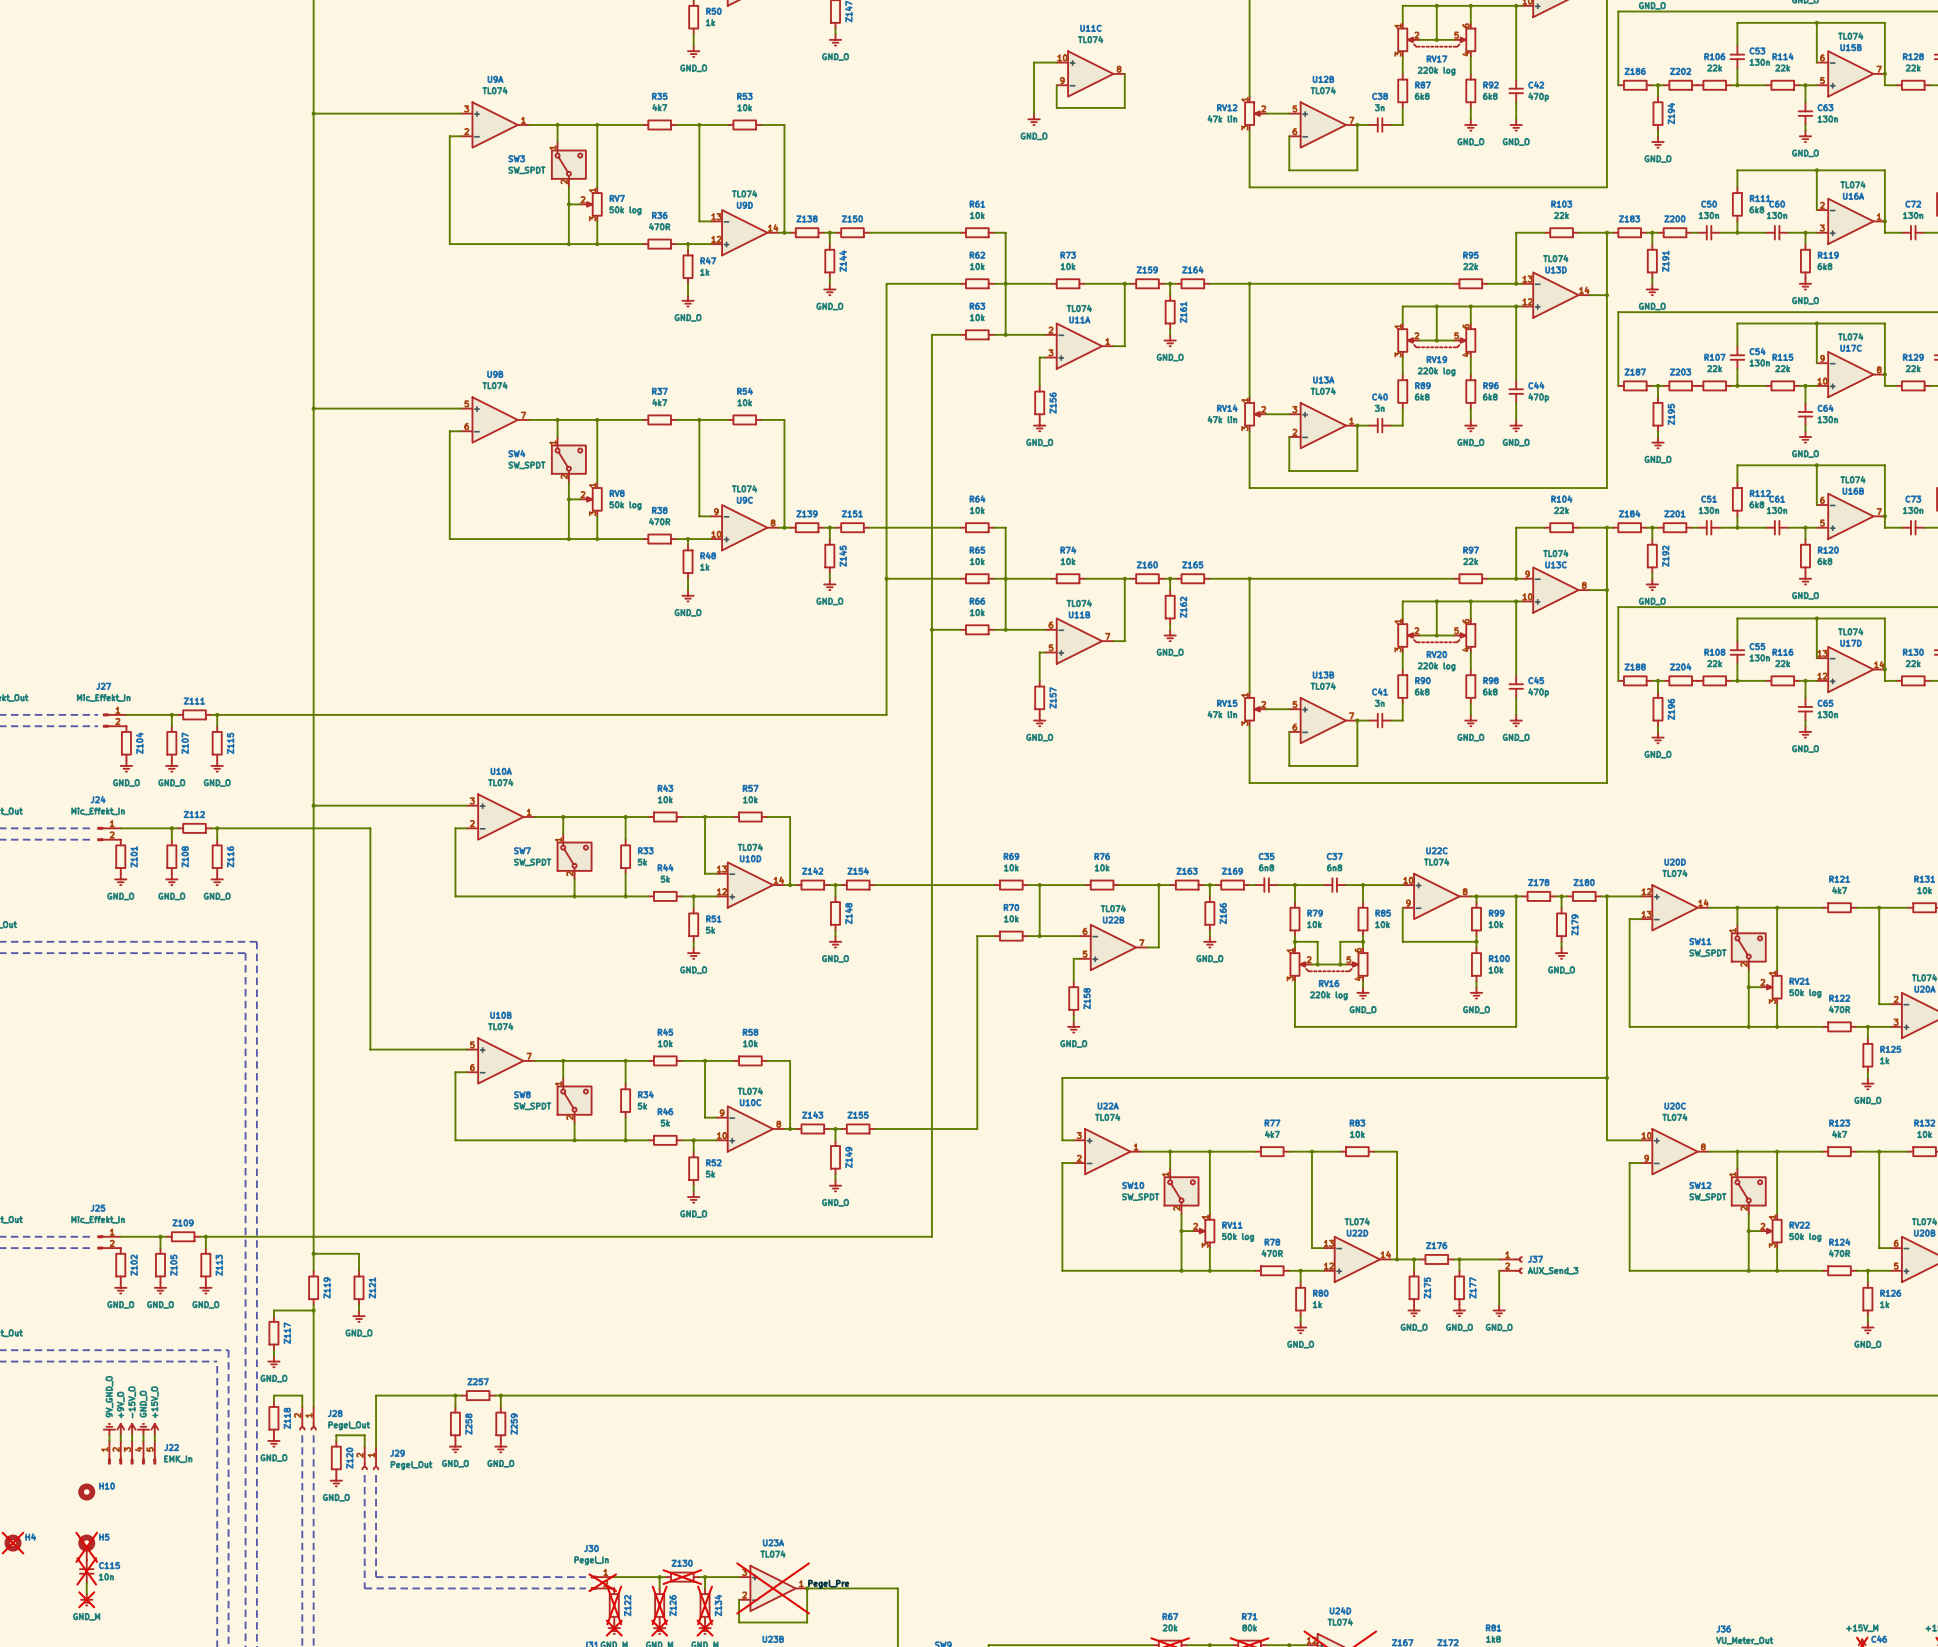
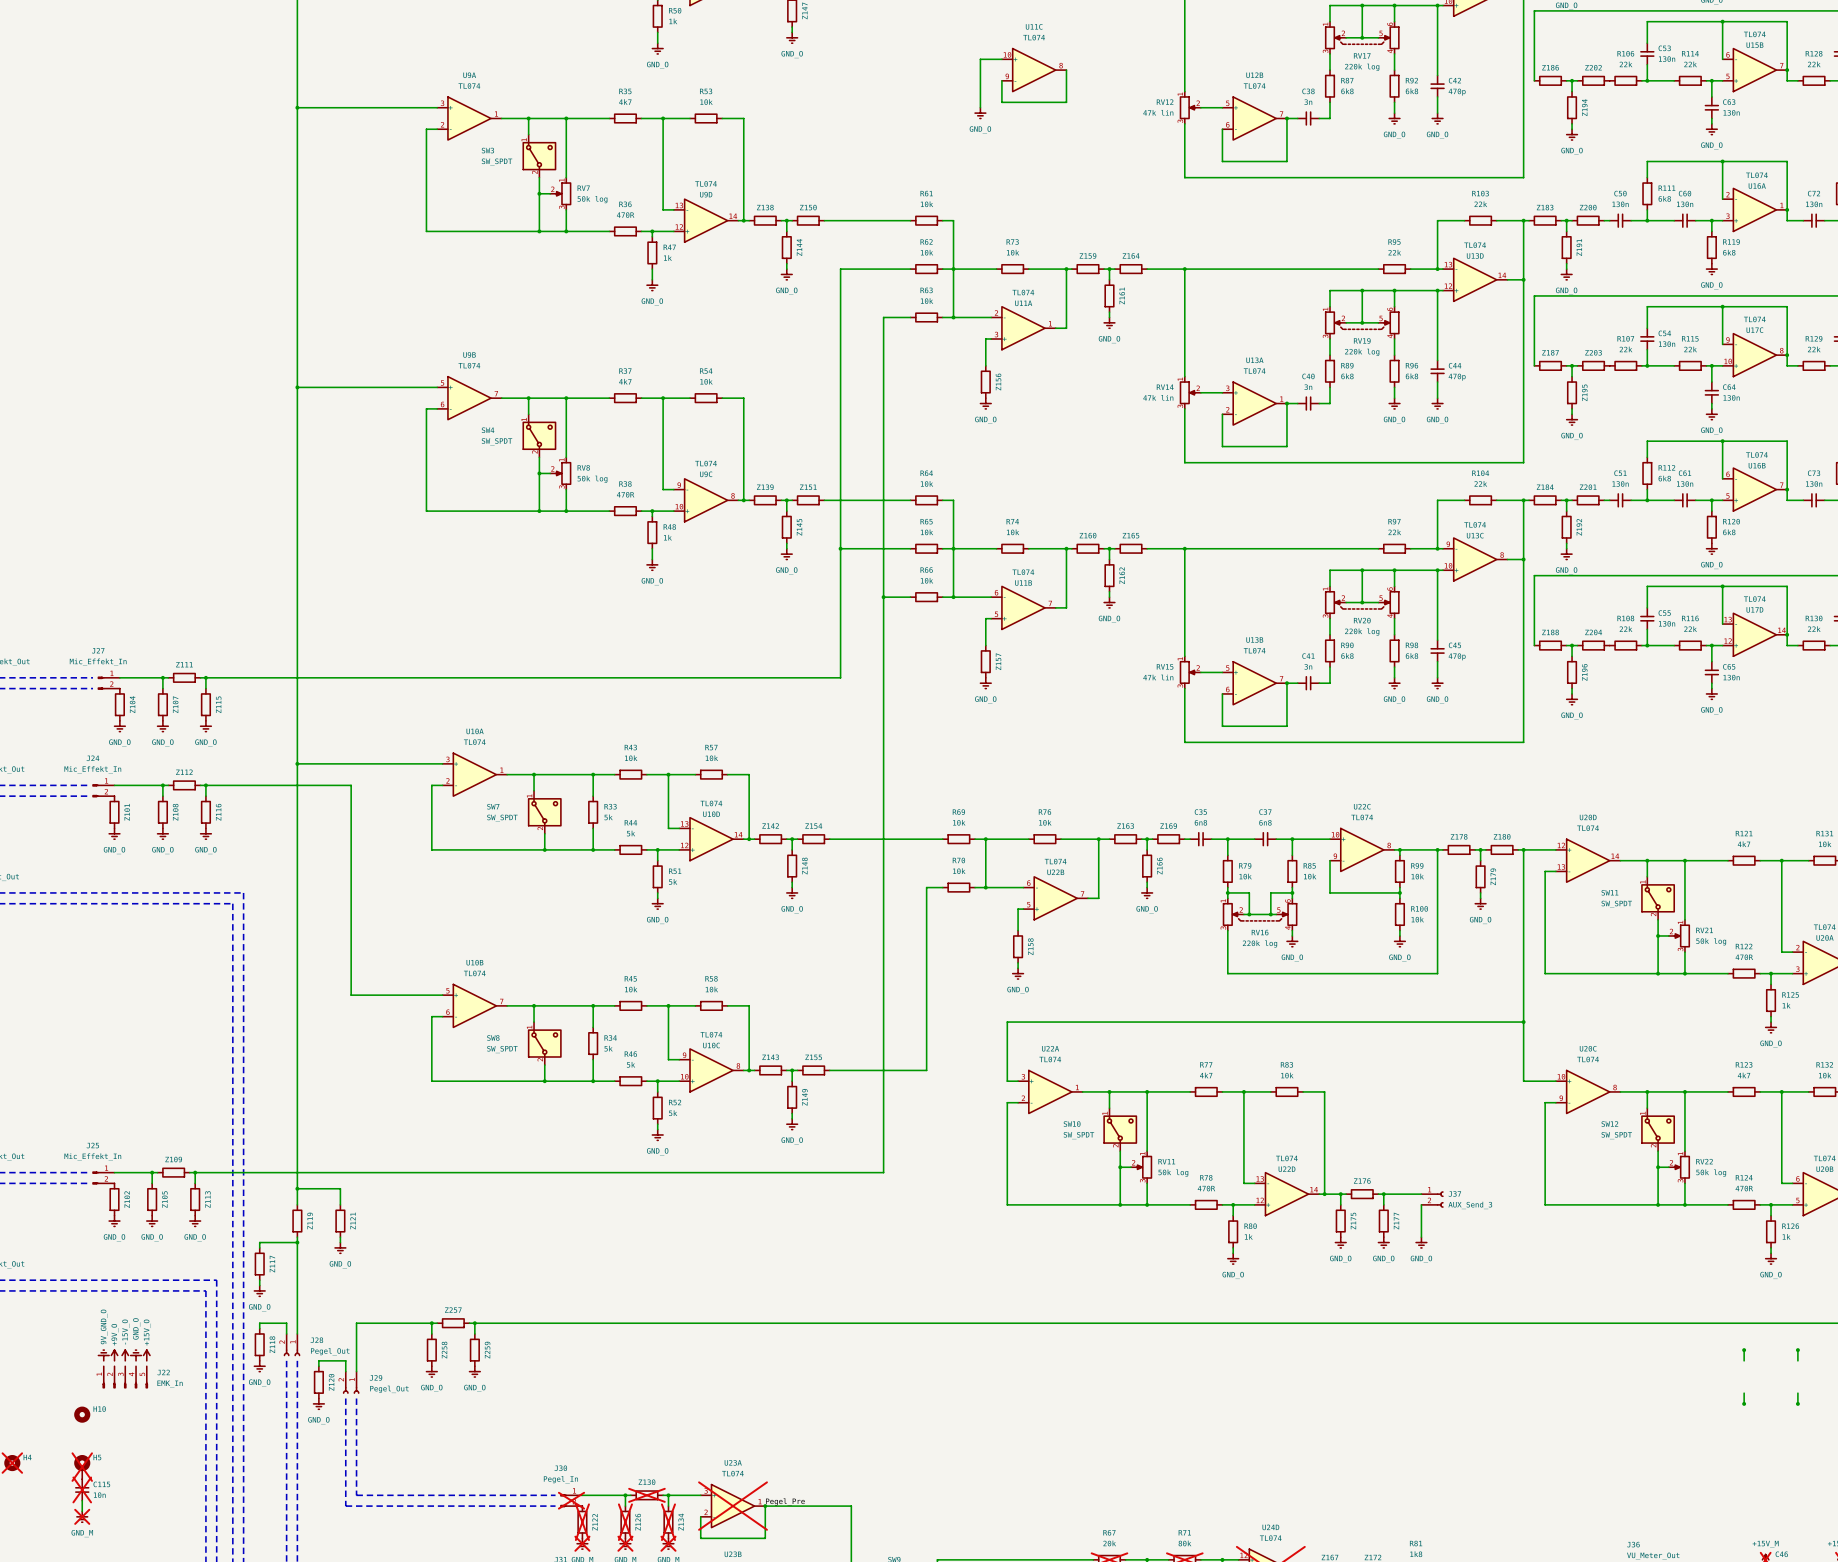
wire: none -> (1744, 1350) (1744, 1360)
junction: none -> (1744, 1350)
wire: none -> (1797, 1350) (1797, 1360)
junction: none -> (1797, 1350)
wire: (109, 1435) (109, 1440) -> none
wire: (120, 1435) (120, 1440) -> none
wire: (132, 1435) (132, 1440) -> none
wire: (143, 1435) (143, 1440) -> none
wire: (154, 1435) (154, 1440) -> none
wire: none -> (1744, 1393) (1744, 1403)
wire: none -> (1797, 1393) (1797, 1403)
junction: none -> (1744, 1403)
junction: none -> (1797, 1403)

